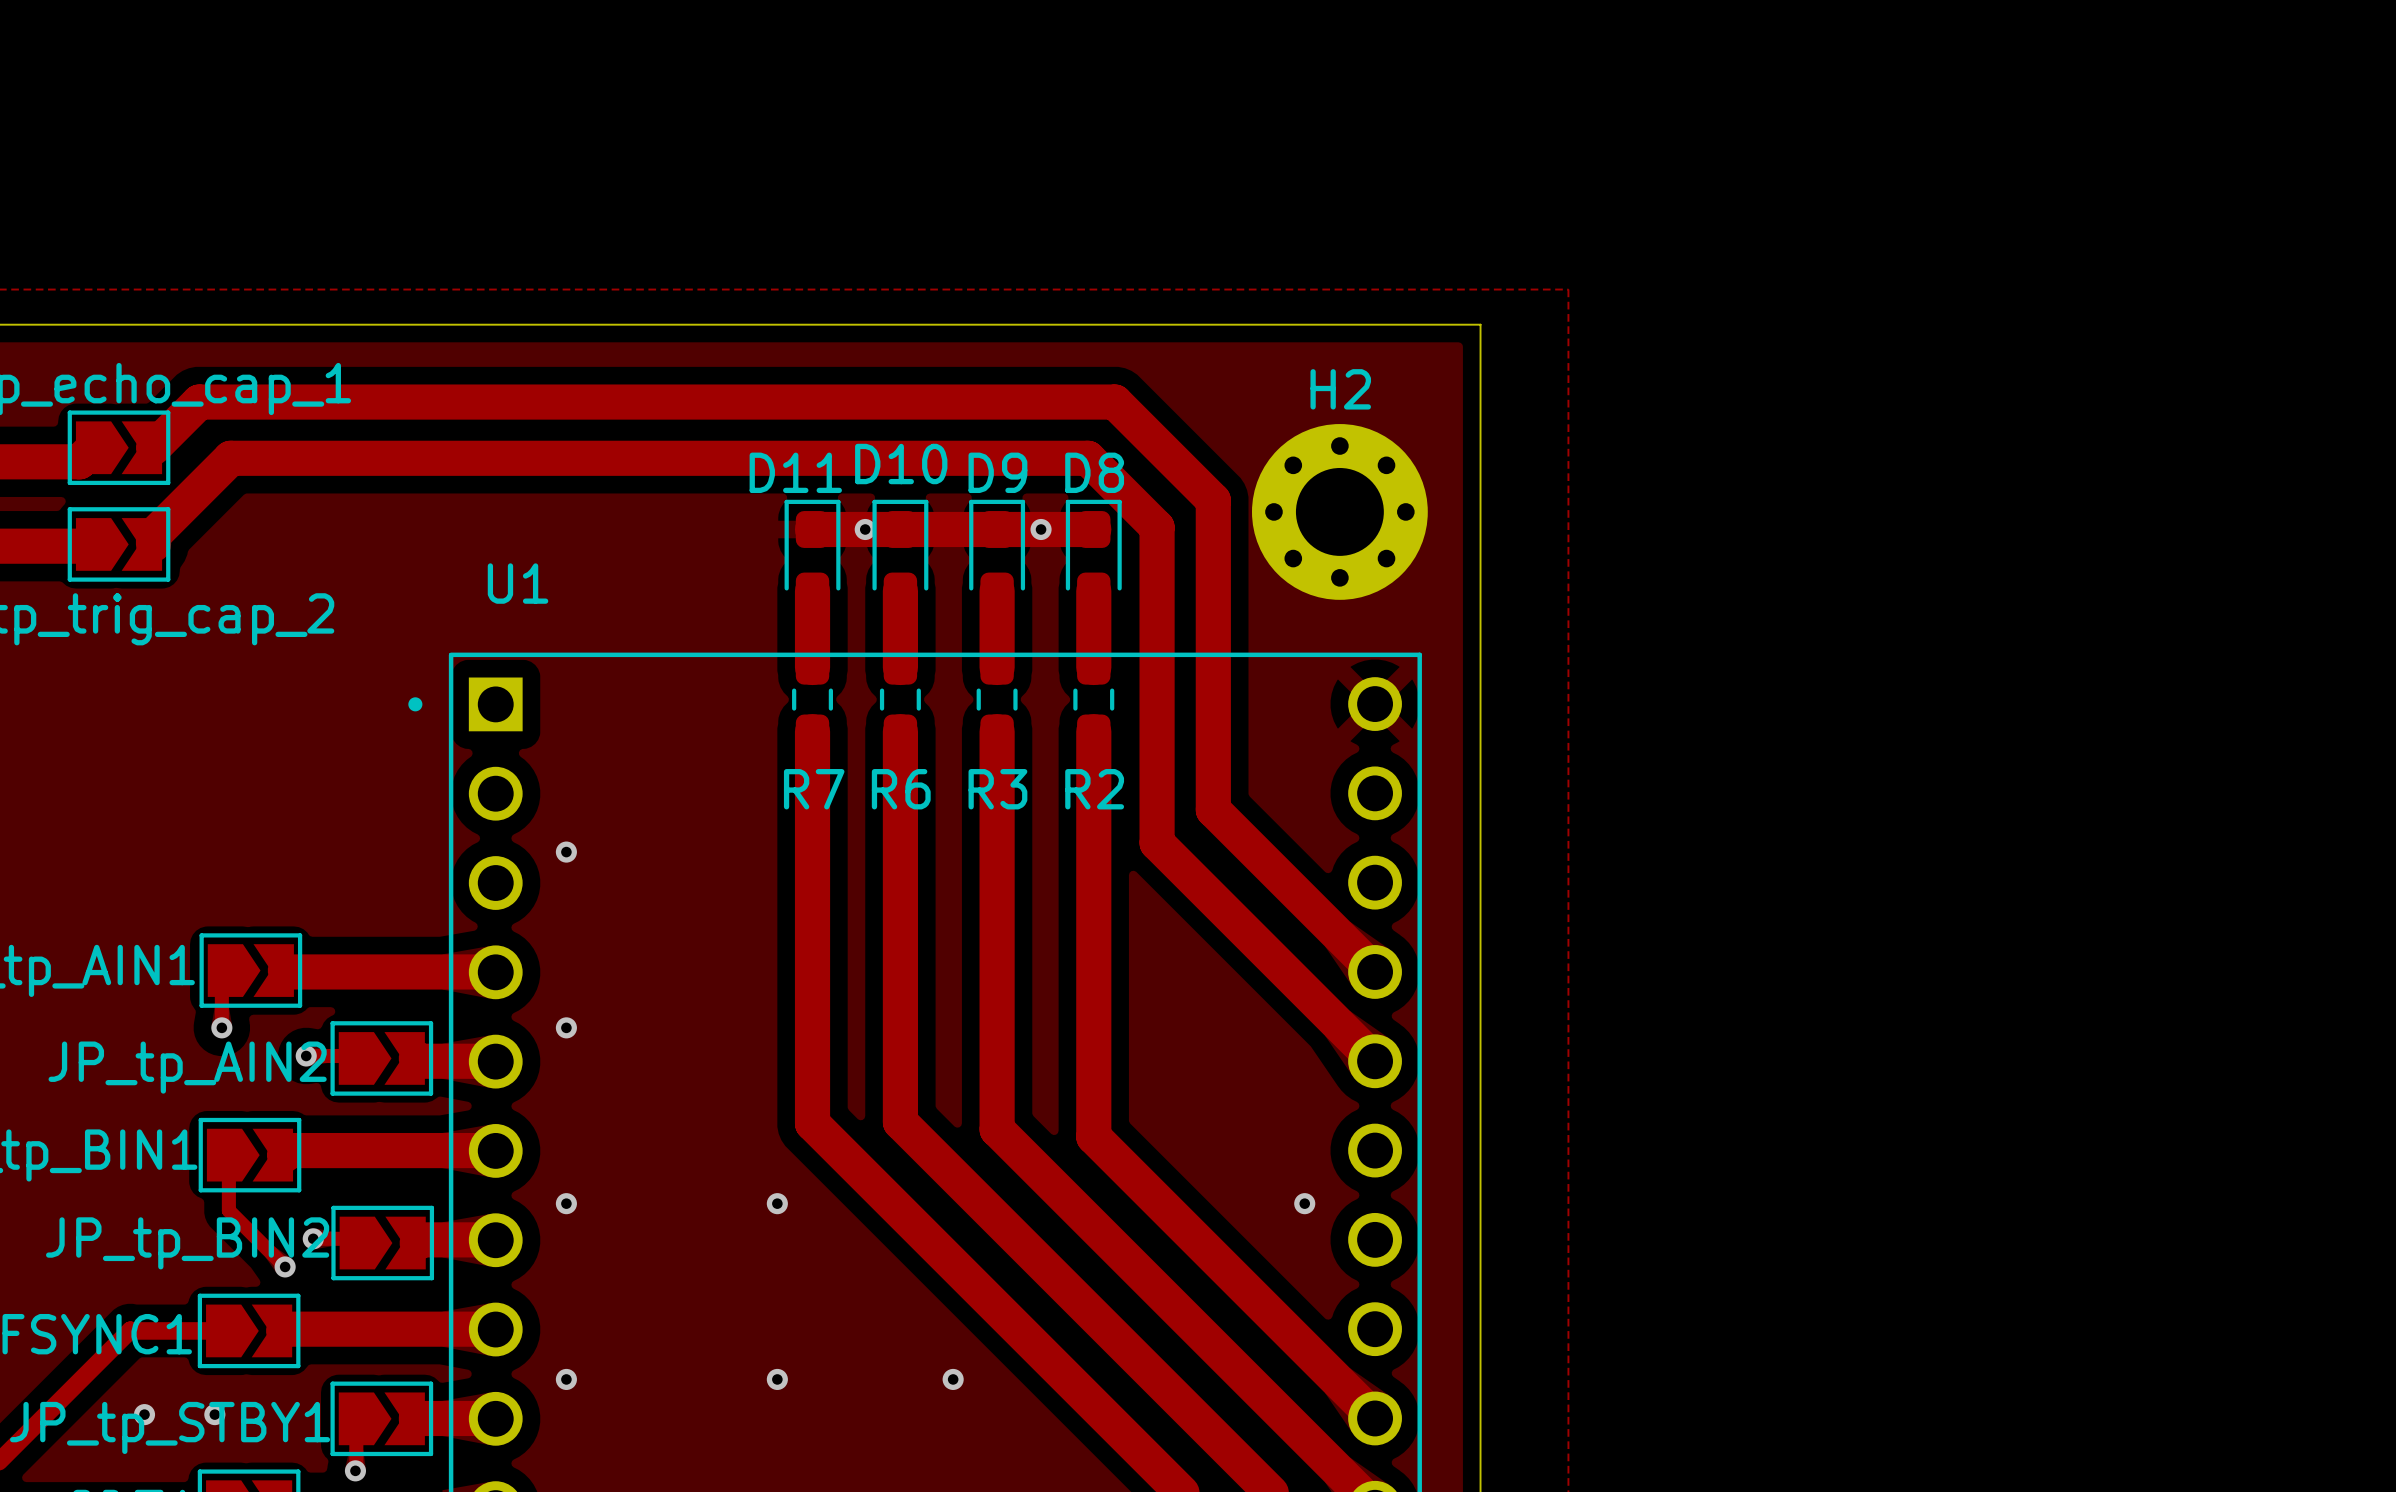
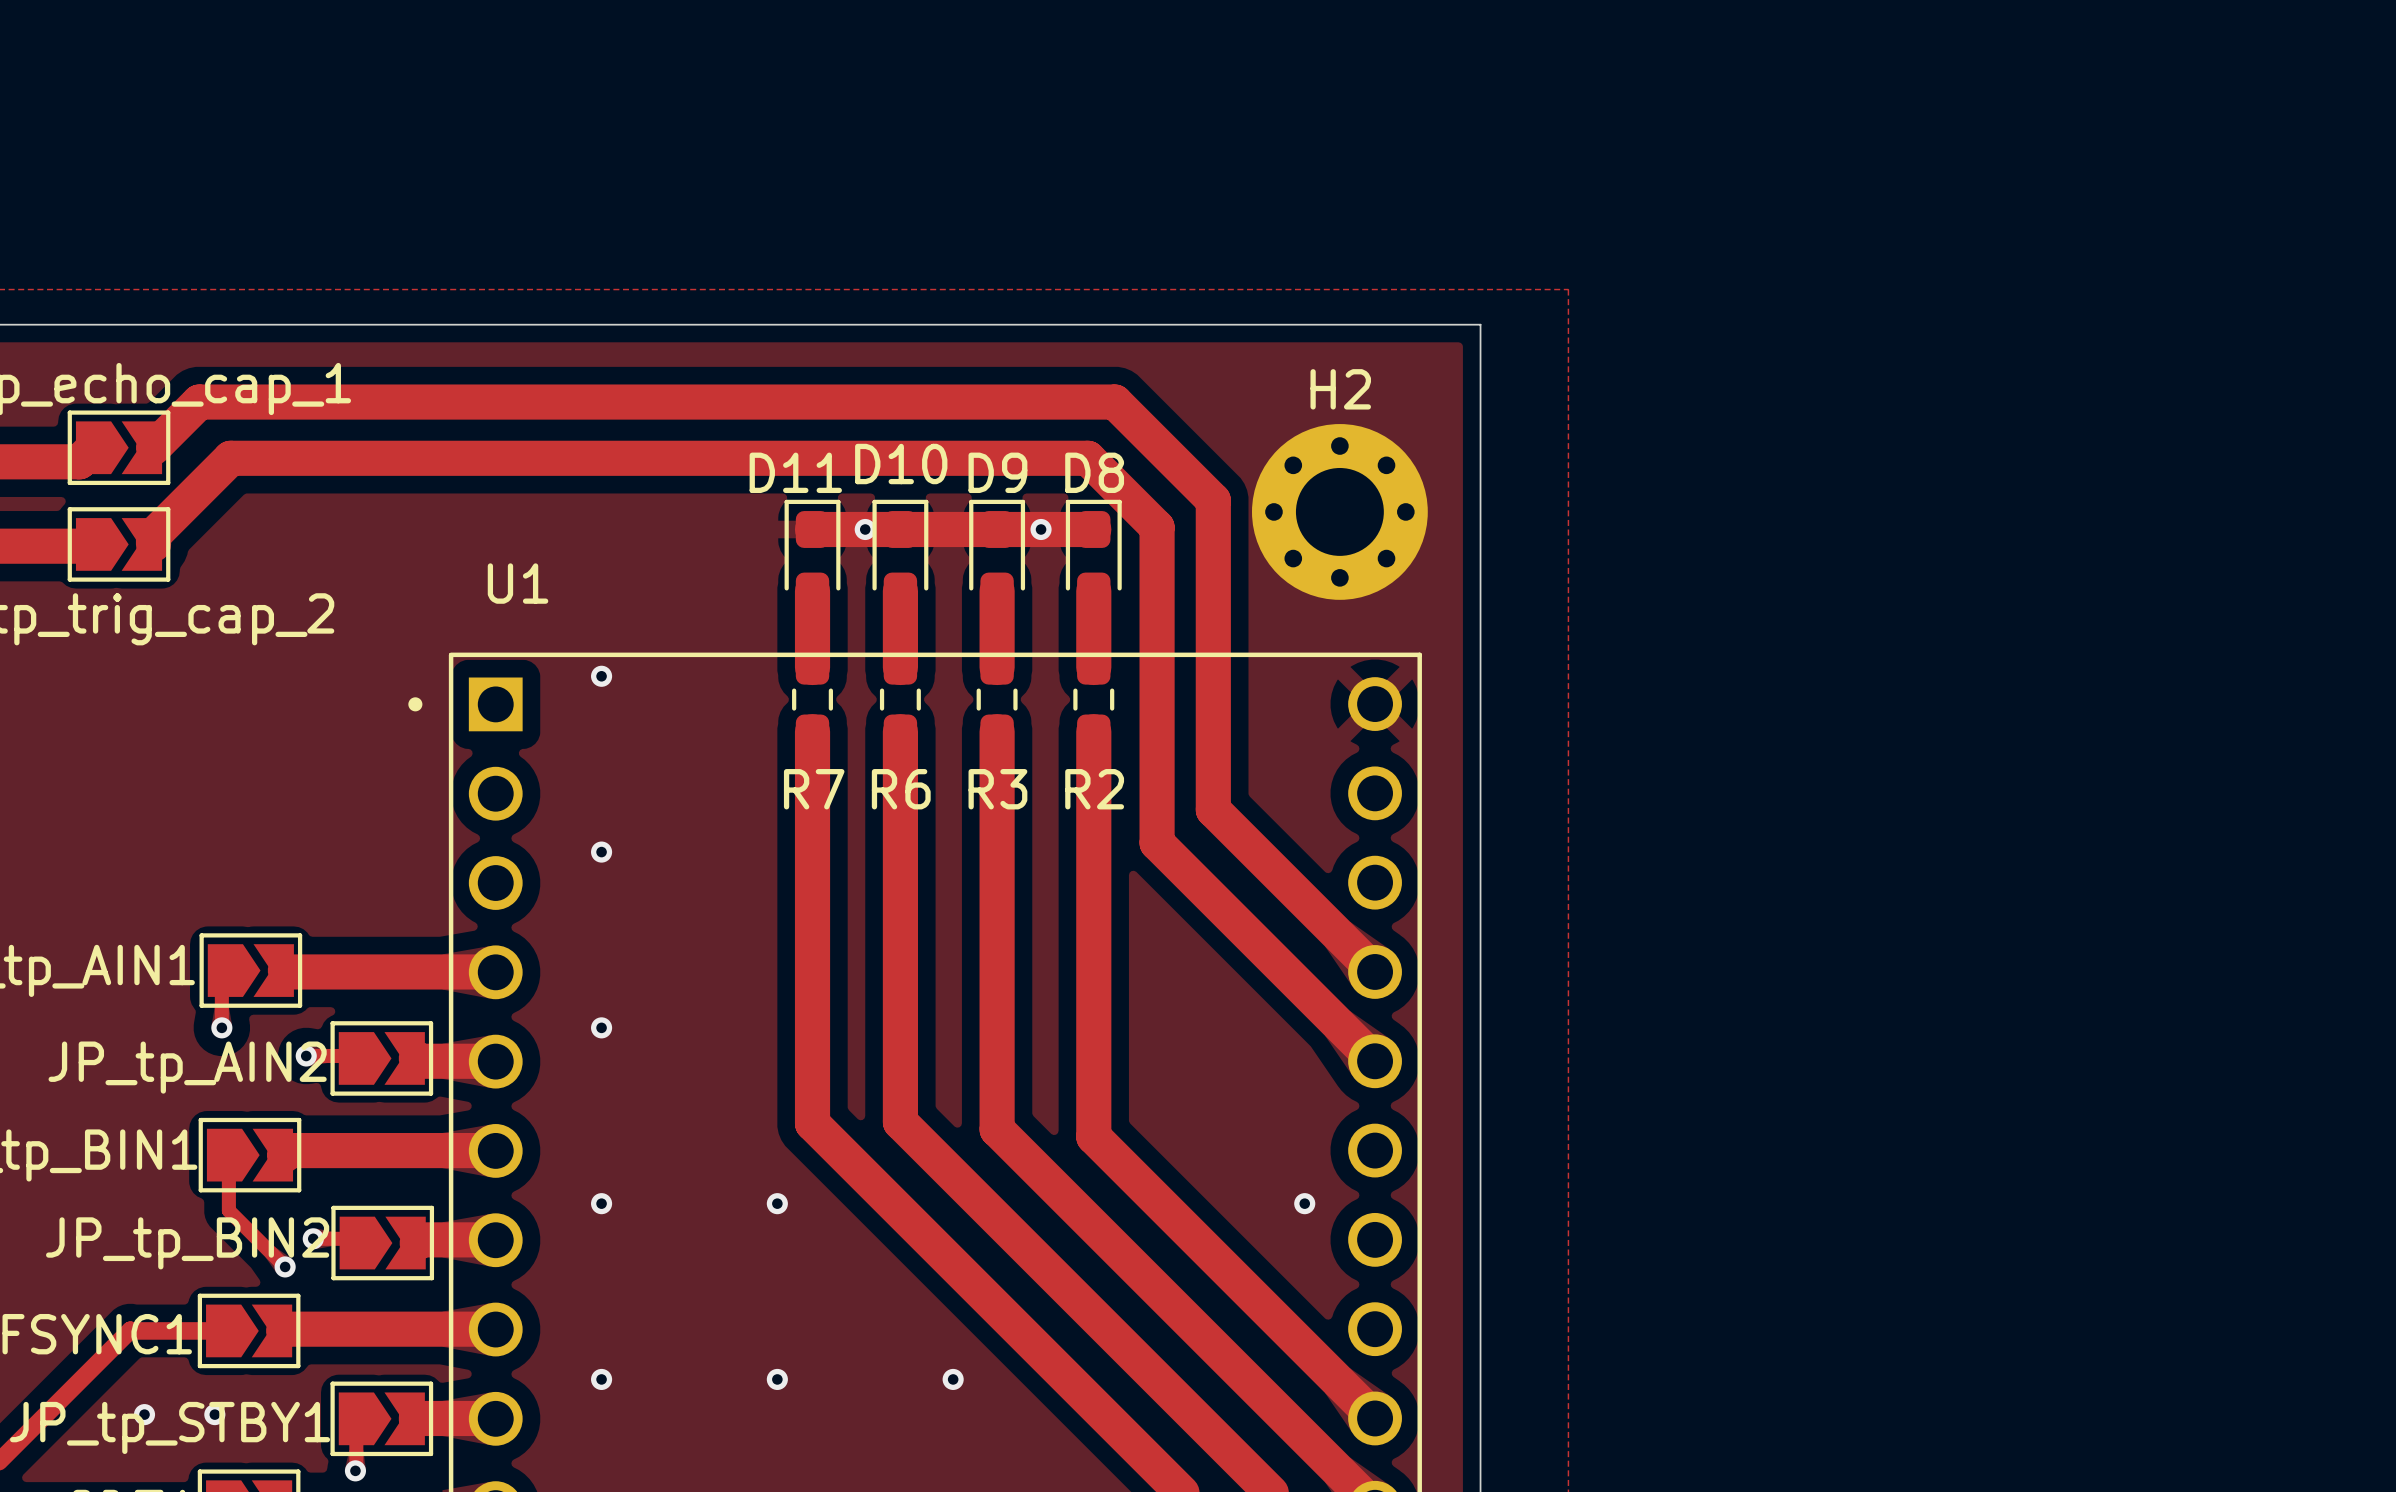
via: none -> (601, 676)
via position: (566, 852) -> (601, 852)
via position: (566, 1027) -> (601, 1027)
via position: (566, 1203) -> (601, 1203)
via position: (566, 1379) -> (601, 1379)

